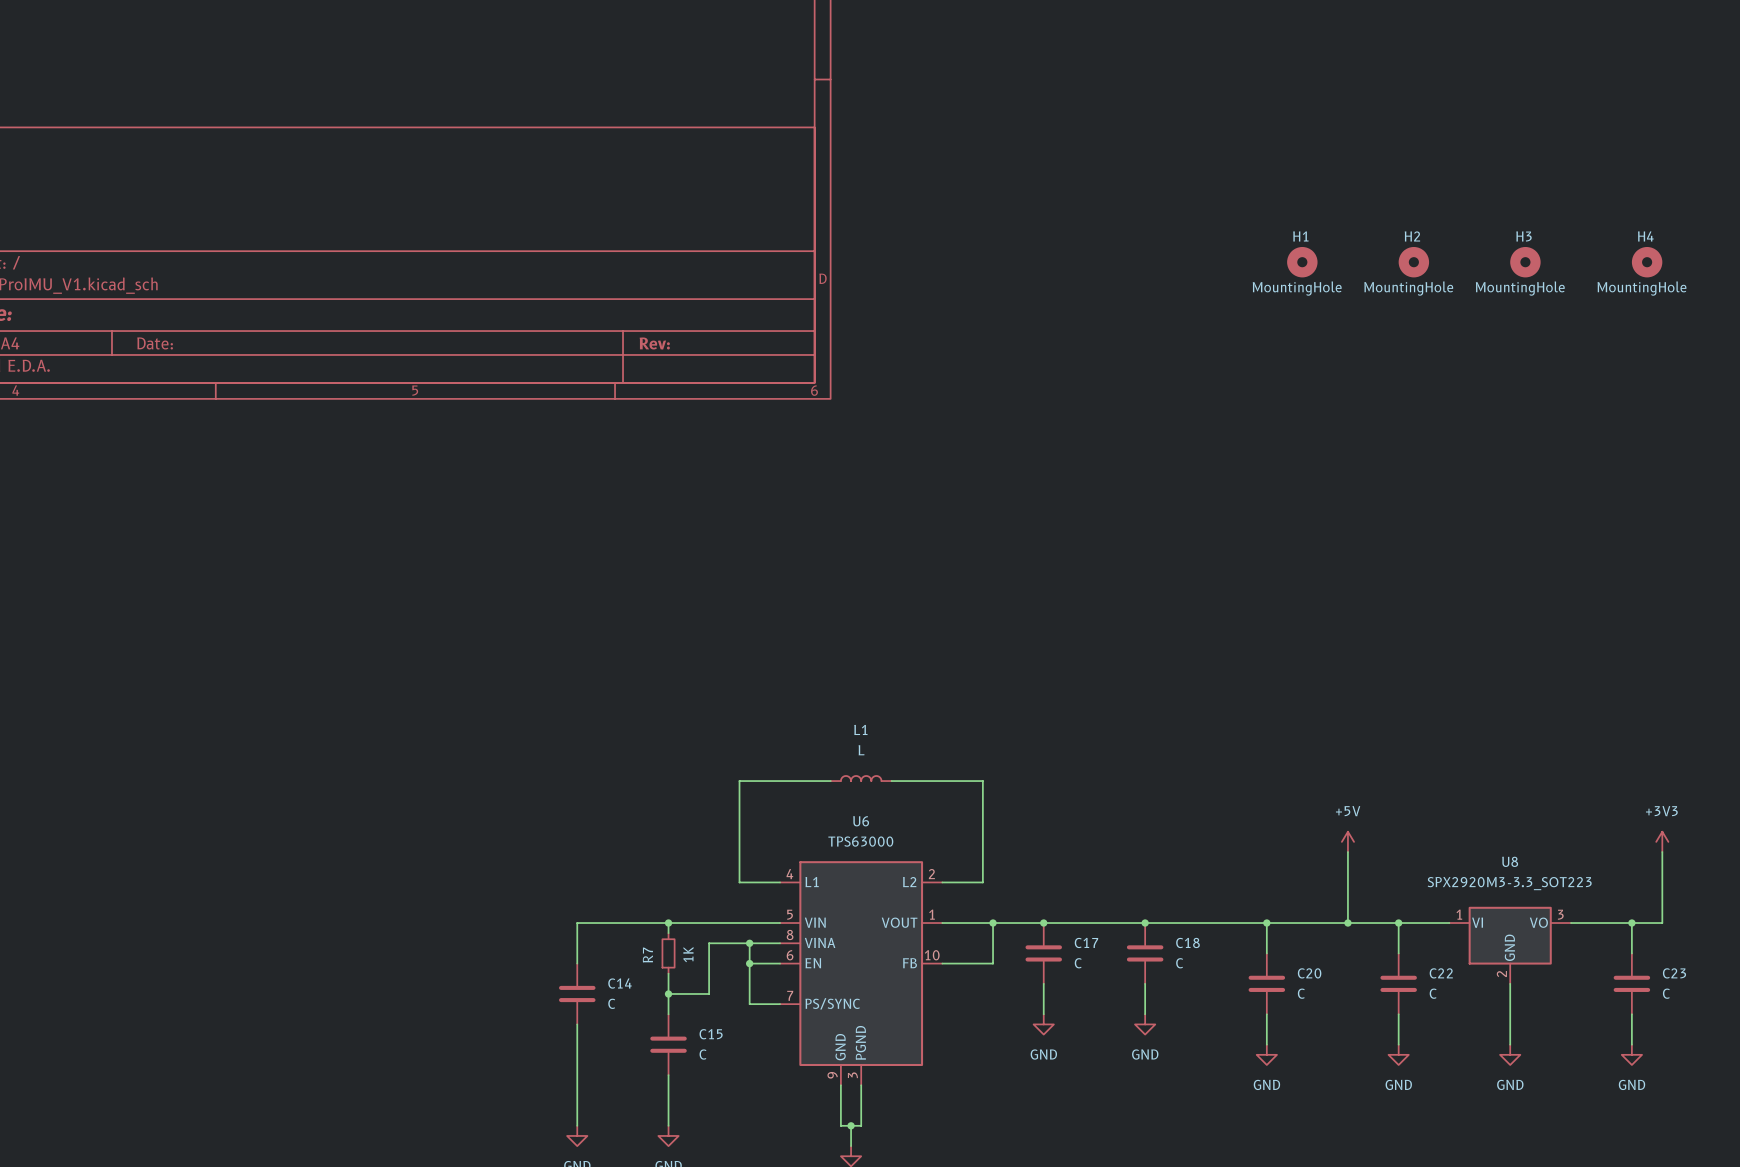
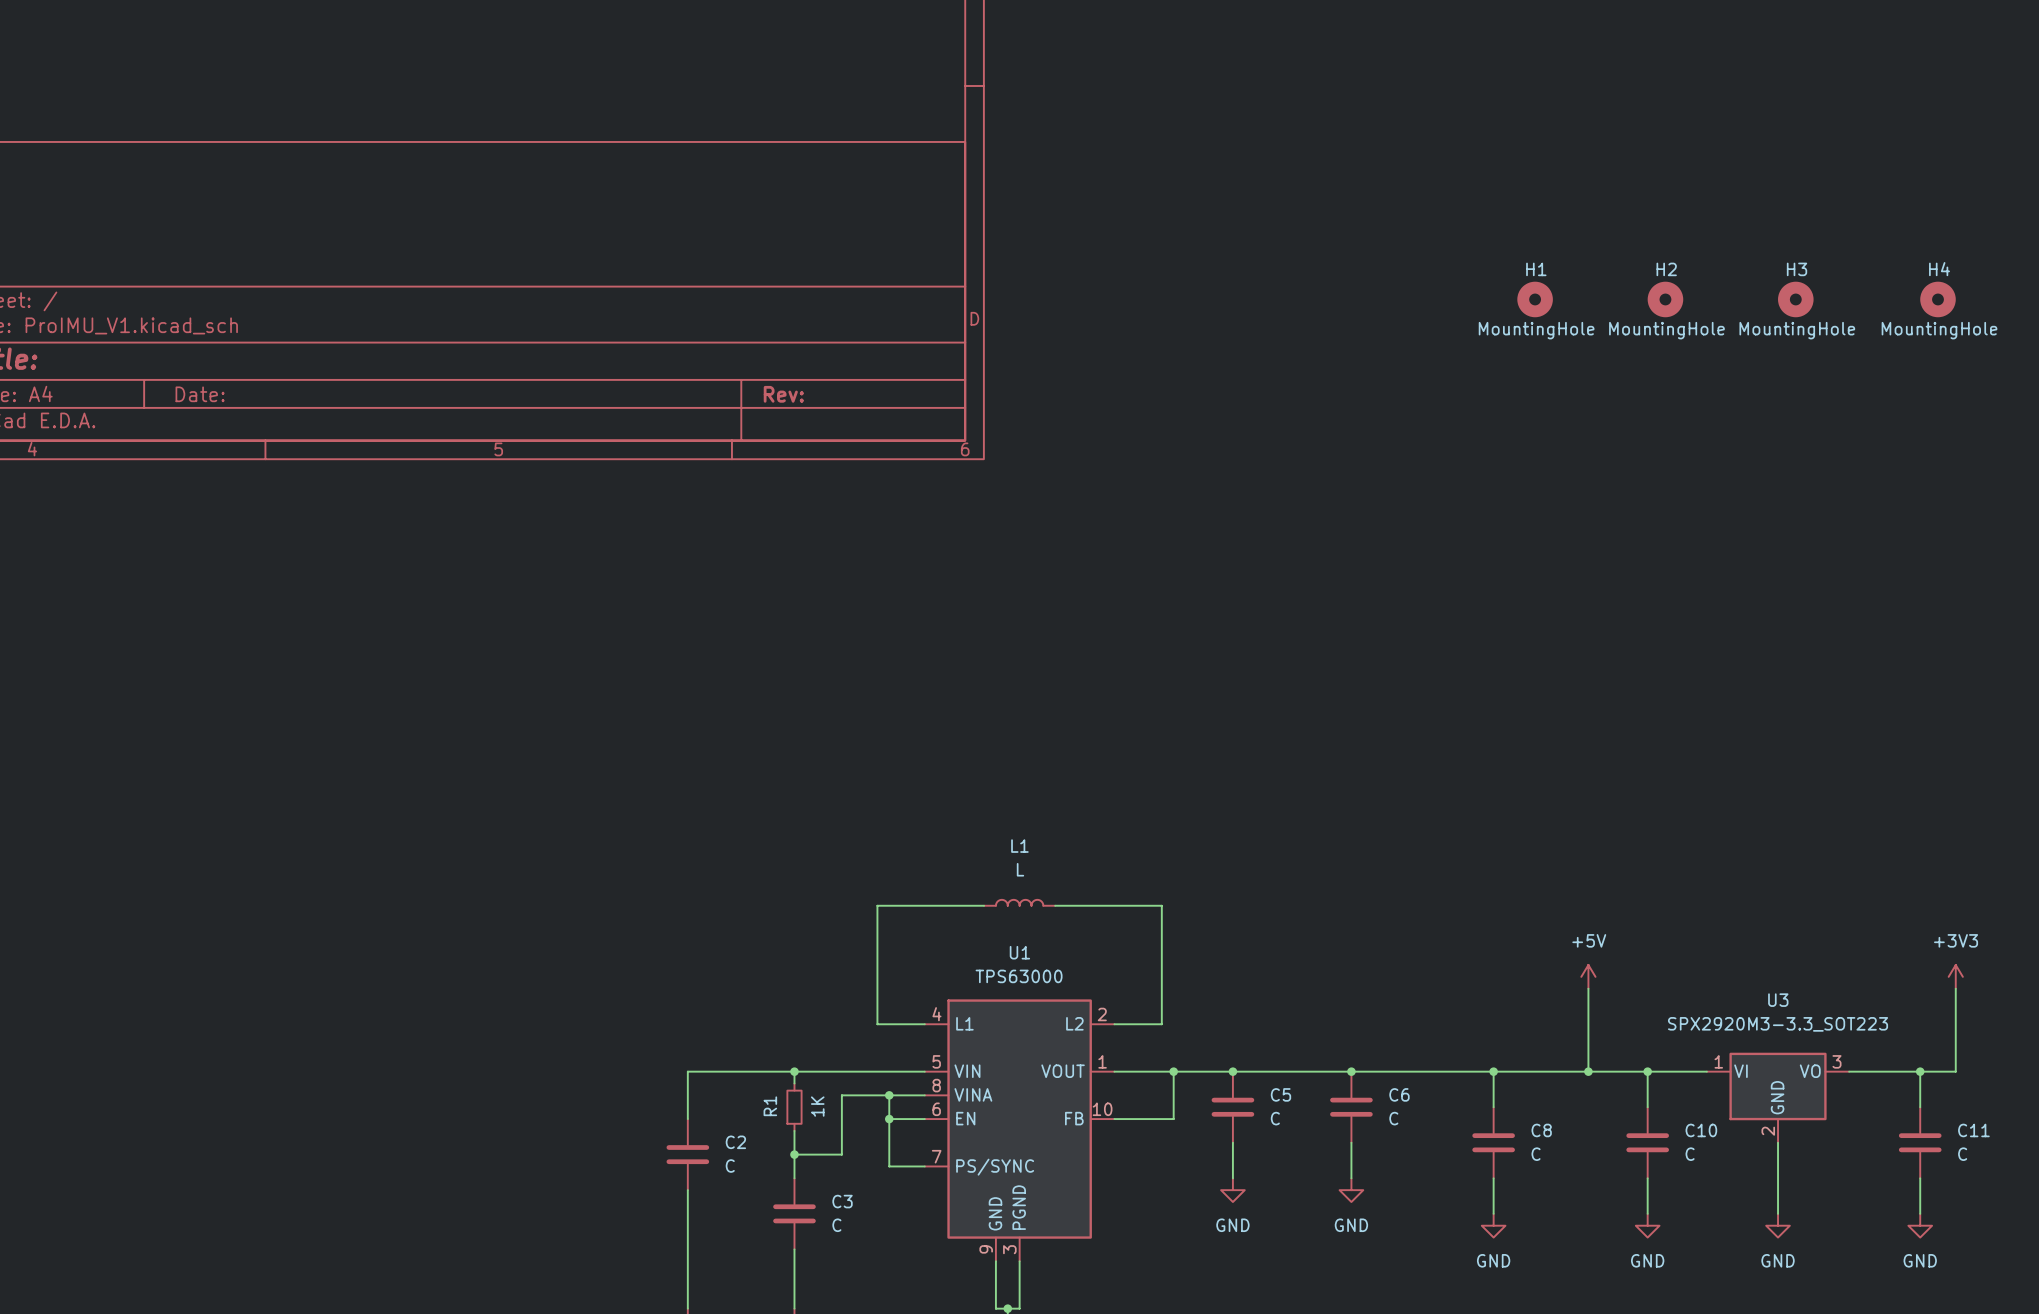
U6 name: U6 (861, 821) -> U1 (1019, 952)
U8 name: U8 (1510, 861) -> U3 (1778, 1000)
C17 name: C17 (1086, 942) -> C5 (1280, 1094)
C18 name: C18 (1187, 942) -> C6 (1399, 1094)
R7 name: R7 (647, 955) -> R1 (770, 1106)
C20 name: C20 (1309, 973) -> C8 (1541, 1130)
C22 name: C22 (1441, 973) -> C10 (1701, 1130)
C23 name: C23 (1674, 973) -> C11 (1973, 1130)
C14 name: C14 (619, 983) -> C2 (735, 1142)
C15 name: C15 (711, 1034) -> C3 (842, 1201)

